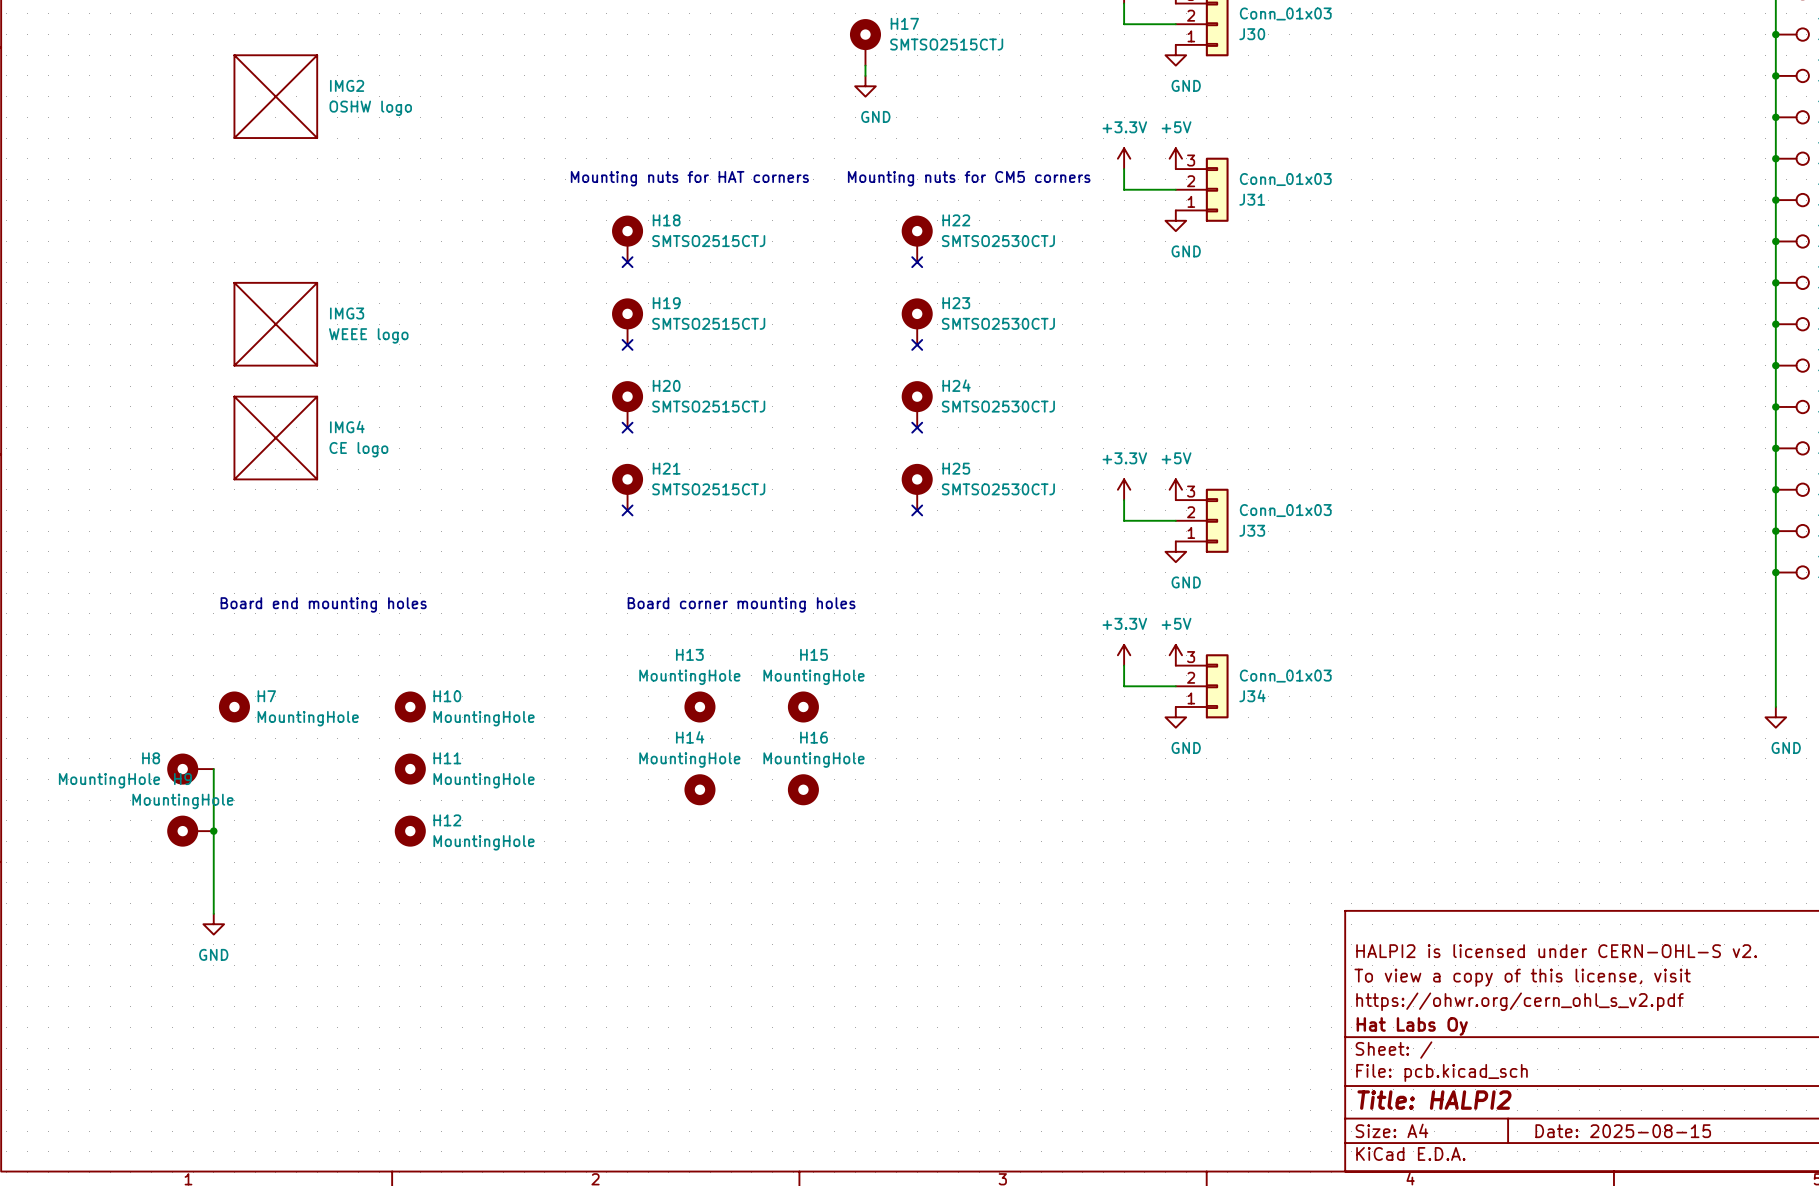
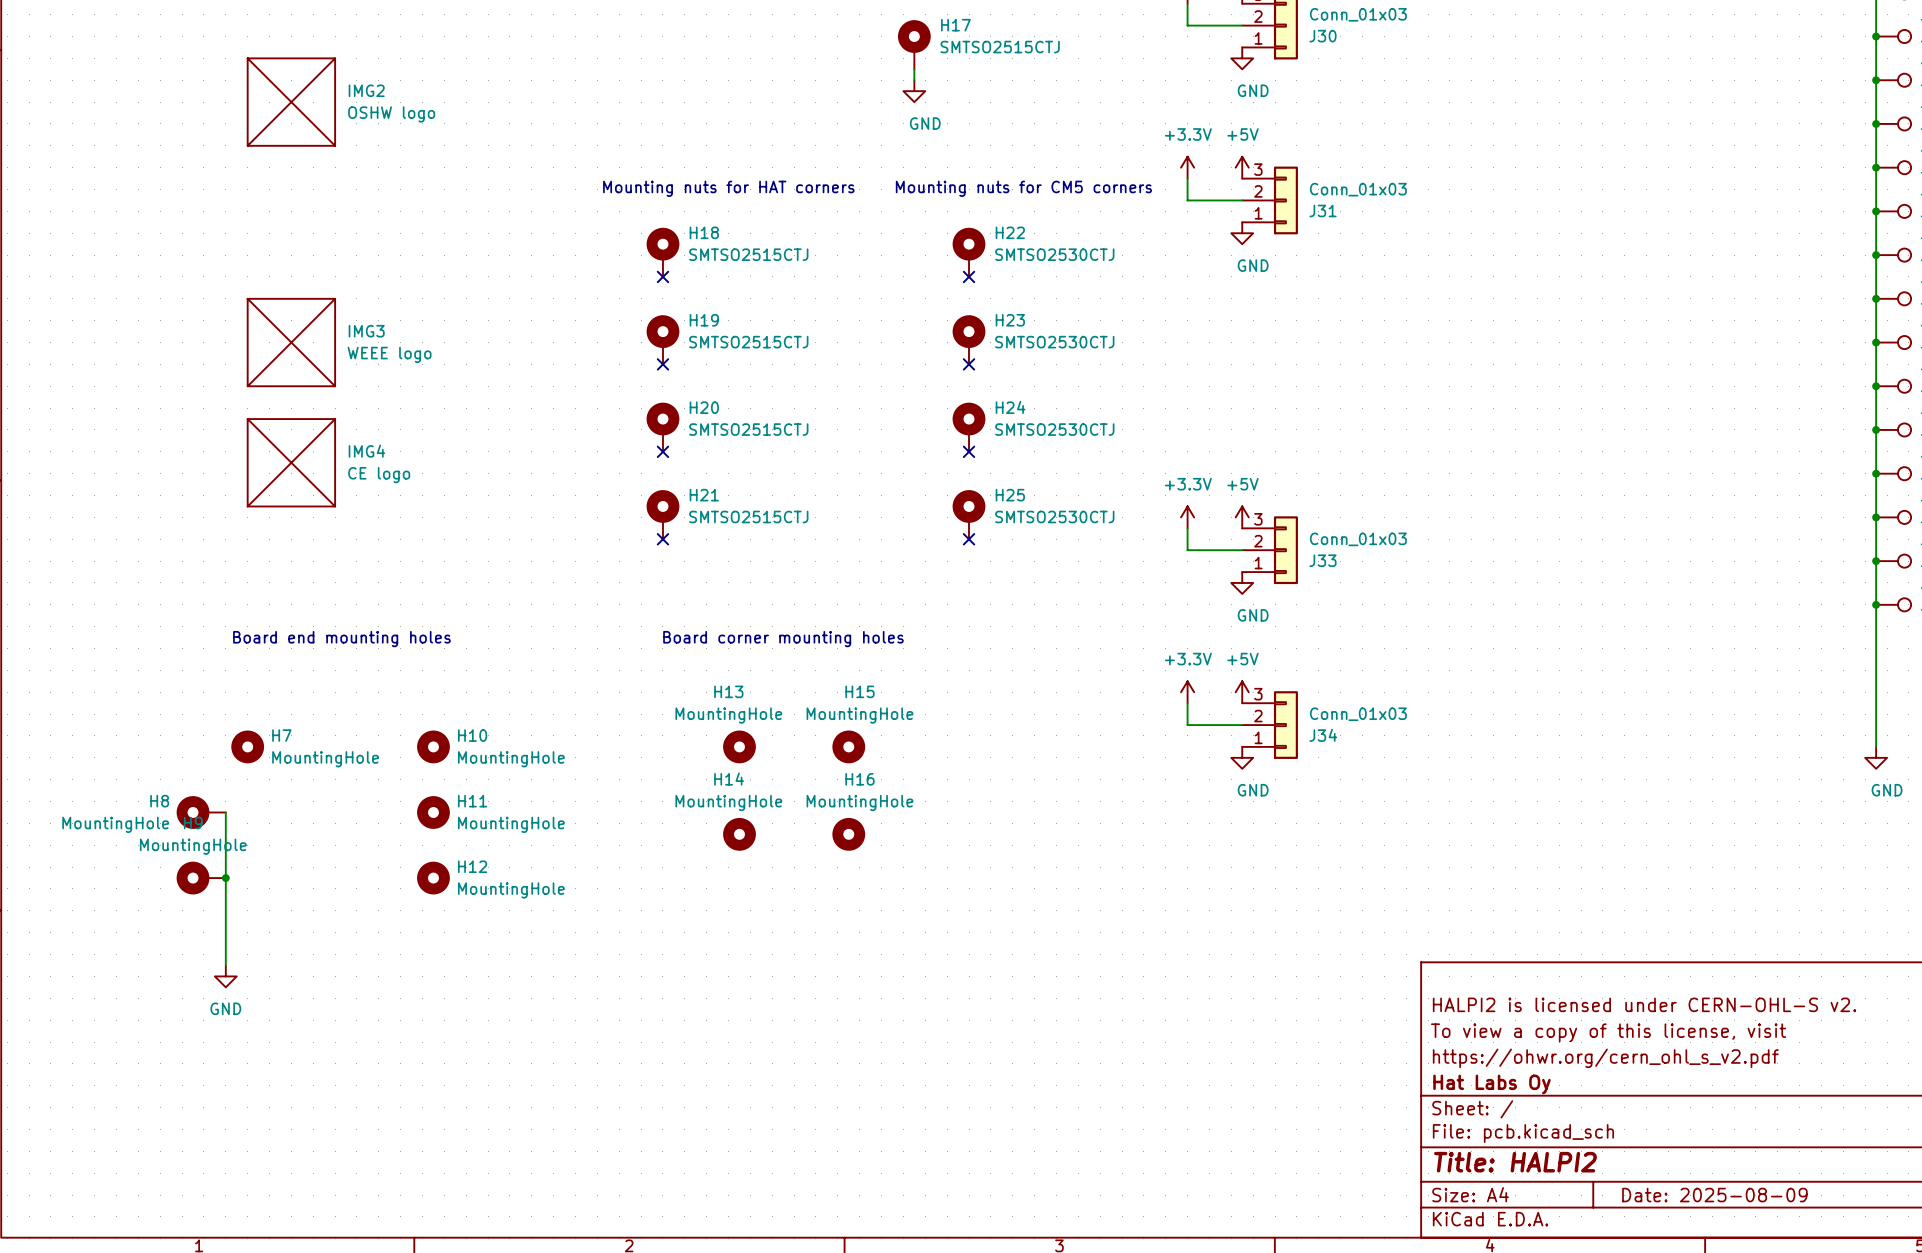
title block: Date: 2025-08-15 (1623, 1131) -> Date: 2025-08-09 (1714, 1195)

